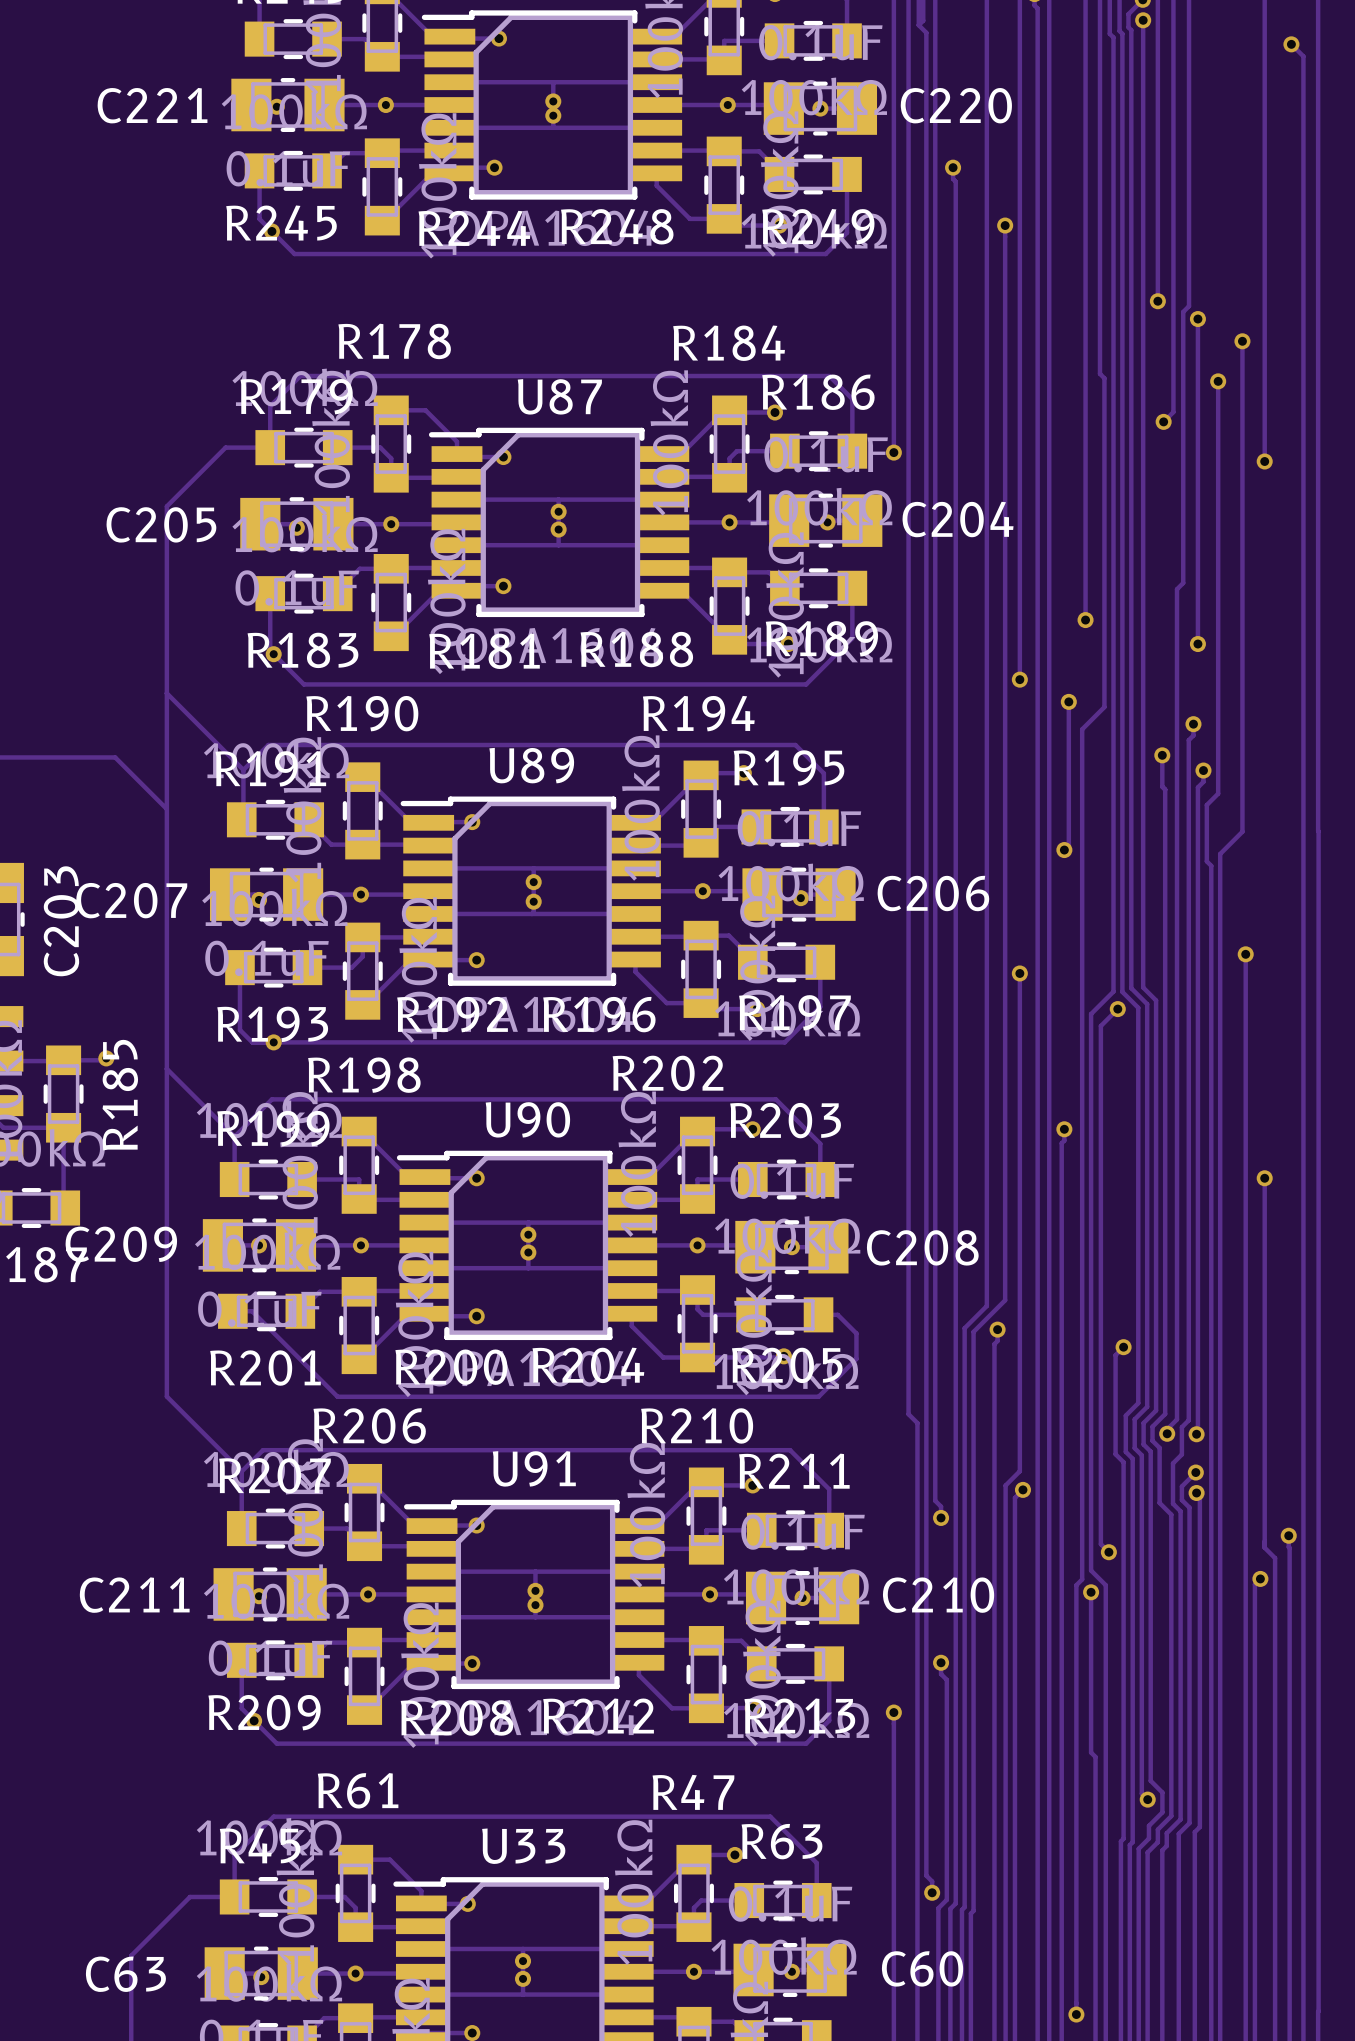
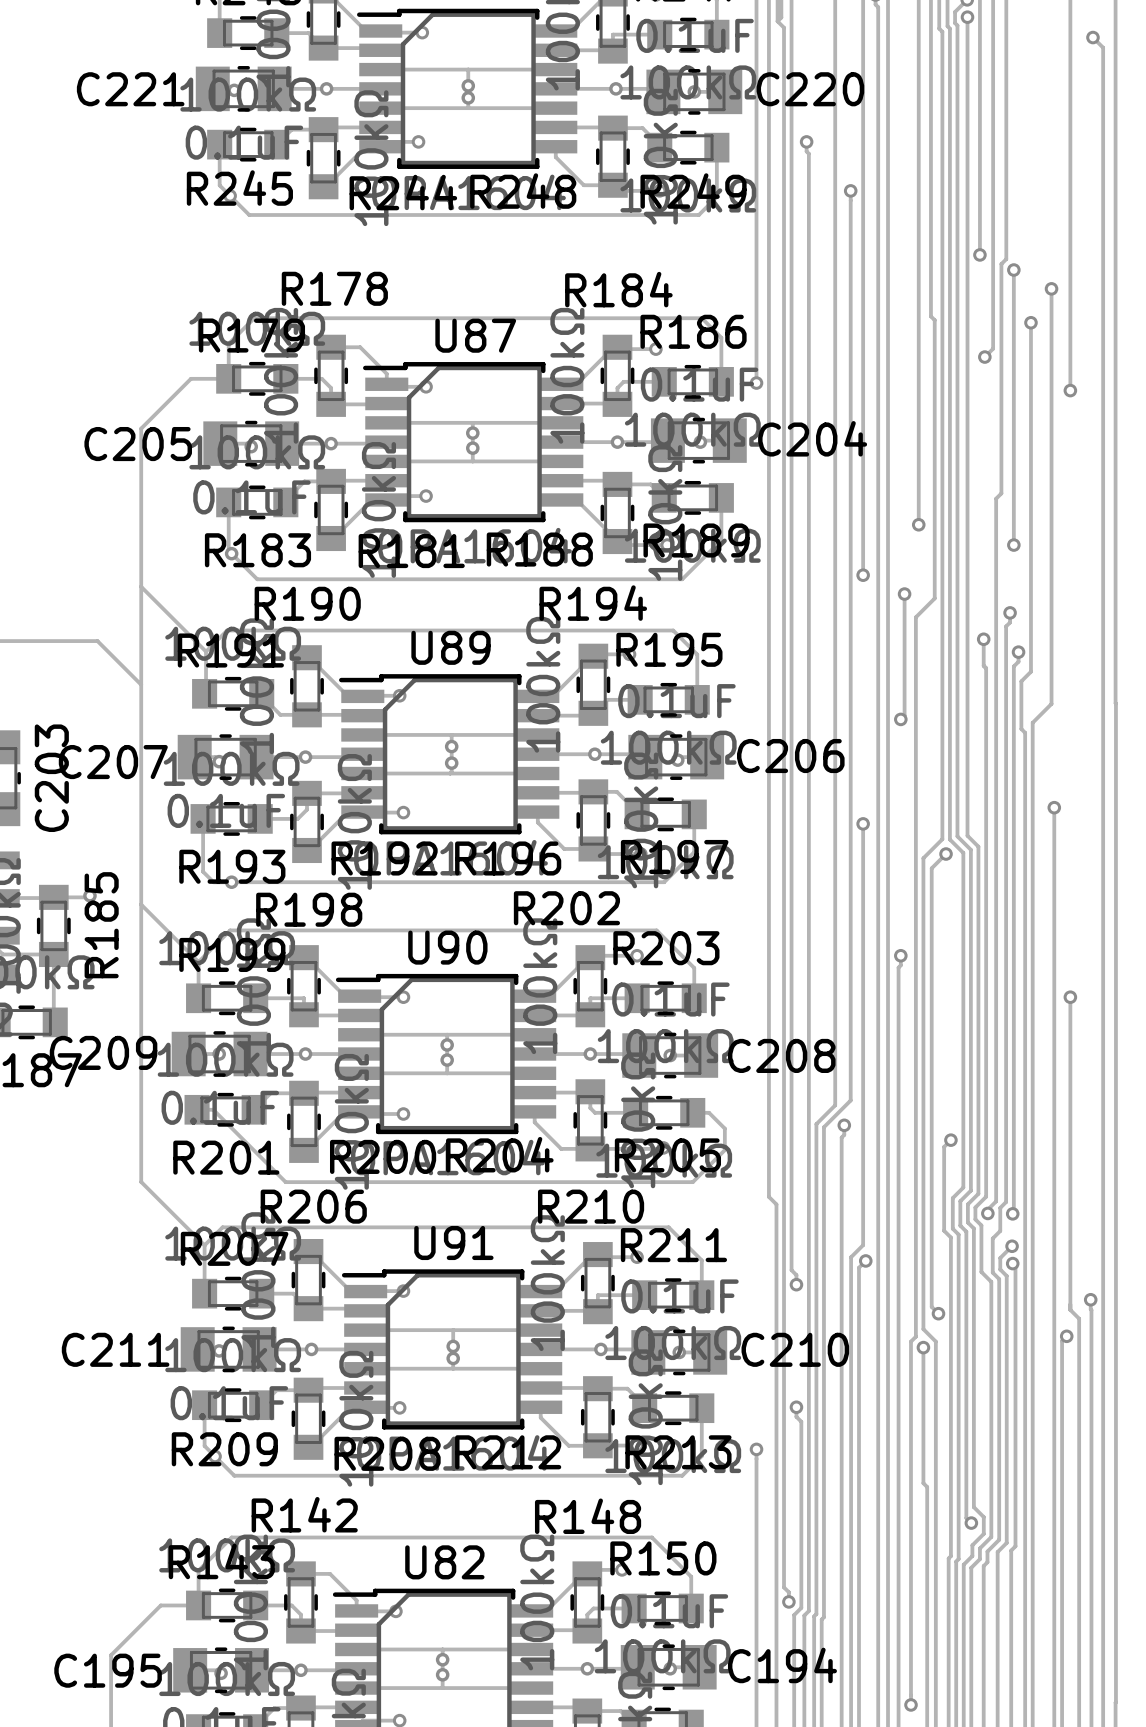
R61 name: R61 (358, 1790) -> R142 (304, 1514)
R47 name: R47 (693, 1792) -> R148 (588, 1516)
R63 name: R63 (782, 1841) -> R150 (663, 1558)
R45 name: R45 (260, 1845) -> R143 (221, 1561)
U33 name: U33 (523, 1846) -> U82 (444, 1562)
C60 name: C60 (922, 1968) -> C194 (782, 1665)
C63 name: C63 (125, 1974) -> C195 (108, 1670)

